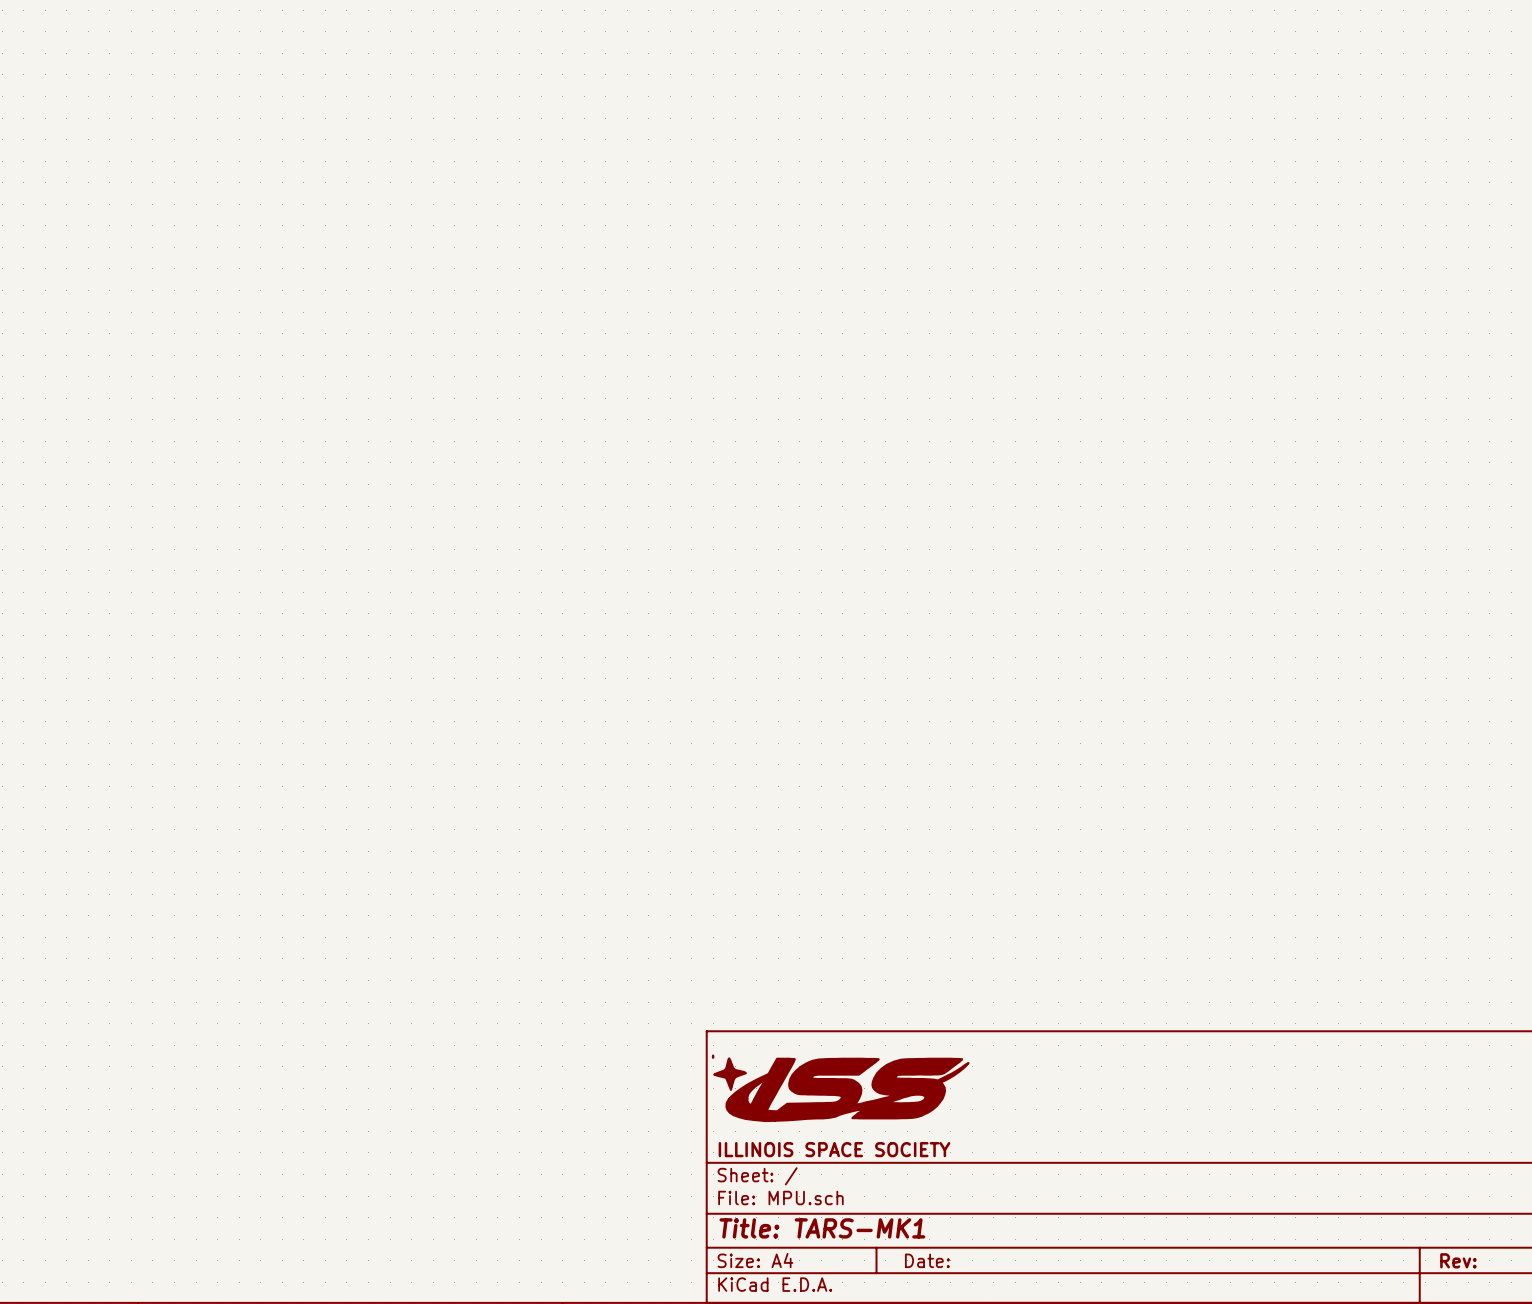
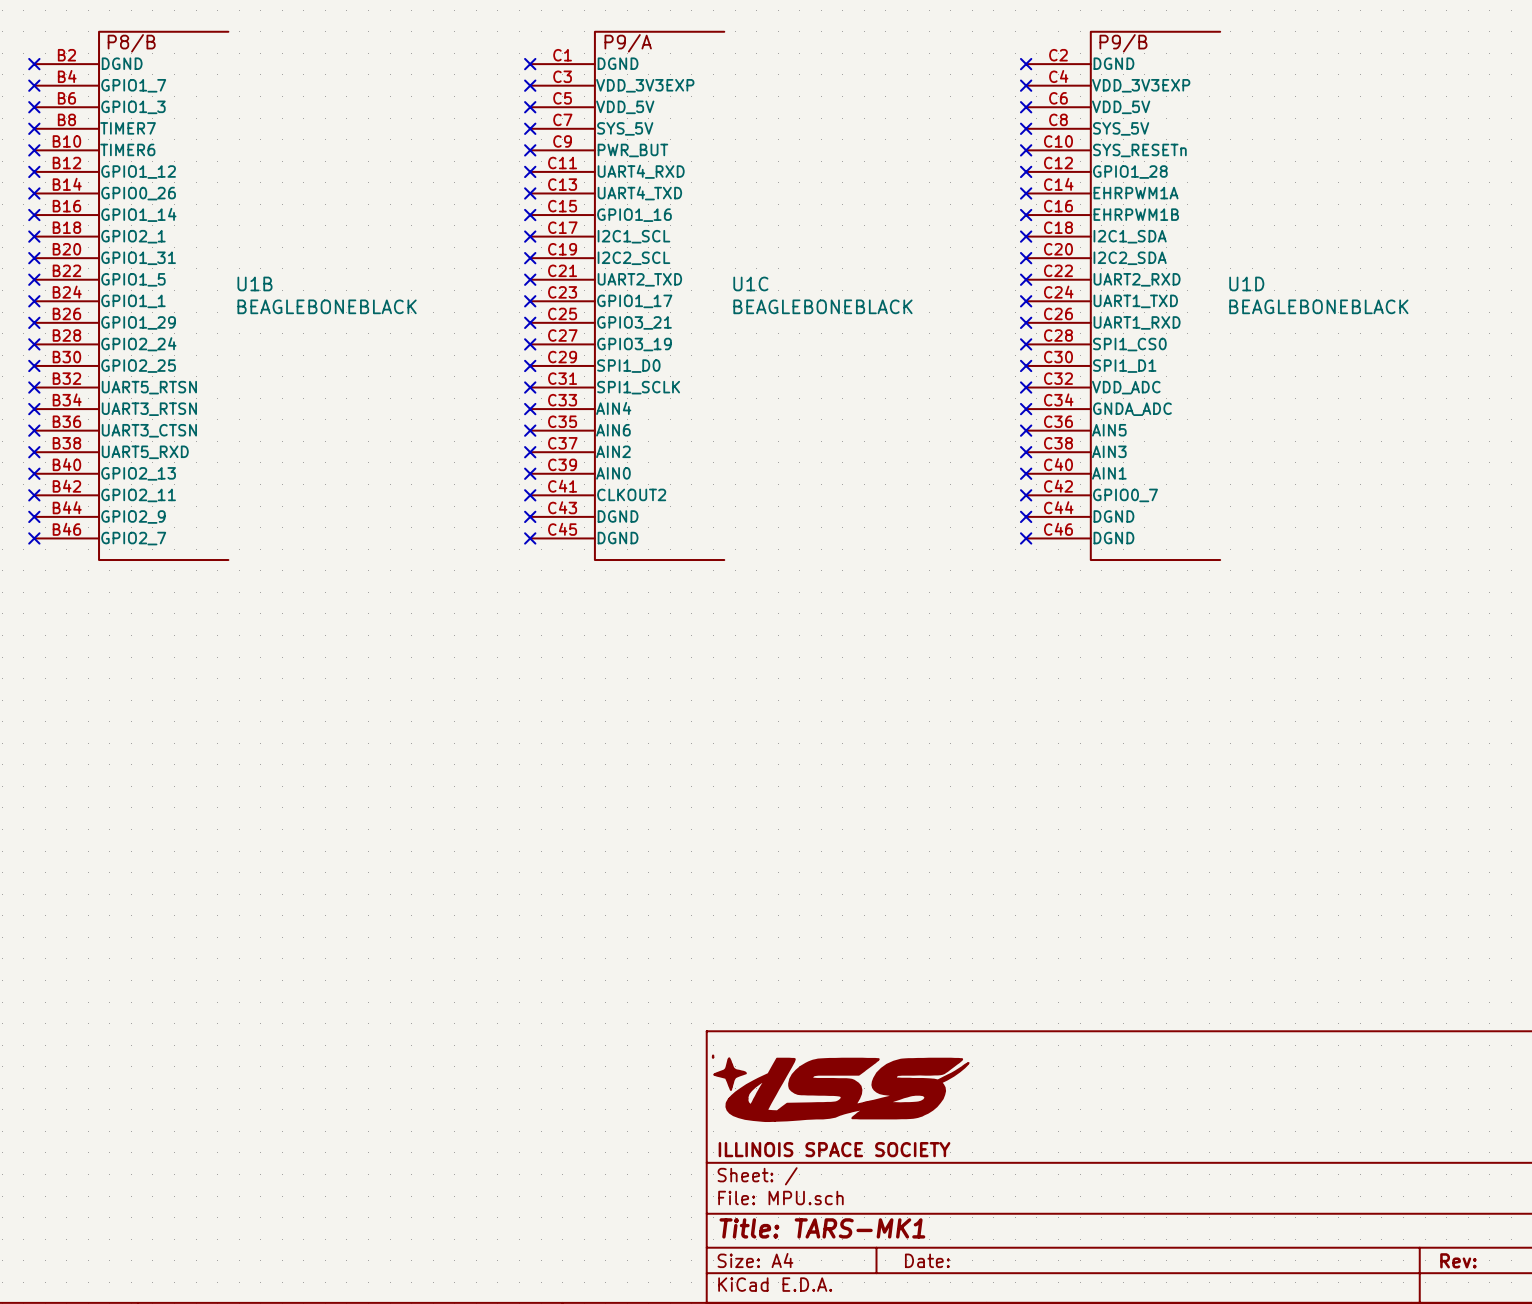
no-connect mark: none -> (34, 64)
no-connect mark: none -> (530, 64)
no-connect mark: none -> (1026, 64)
no-connect mark: none -> (34, 85)
no-connect mark: none -> (530, 85)
no-connect mark: none -> (1026, 85)
no-connect mark: none -> (34, 107)
no-connect mark: none -> (530, 107)
no-connect mark: none -> (1026, 107)
no-connect mark: none -> (34, 128)
no-connect mark: none -> (530, 128)
no-connect mark: none -> (1026, 128)
no-connect mark: none -> (34, 150)
no-connect mark: none -> (530, 150)
no-connect mark: none -> (1026, 150)
no-connect mark: none -> (34, 171)
no-connect mark: none -> (530, 171)
no-connect mark: none -> (1026, 171)
no-connect mark: none -> (34, 193)
no-connect mark: none -> (530, 193)
no-connect mark: none -> (1026, 193)
no-connect mark: none -> (34, 215)
no-connect mark: none -> (530, 215)
no-connect mark: none -> (1026, 215)
no-connect mark: none -> (34, 236)
no-connect mark: none -> (530, 236)
no-connect mark: none -> (1026, 236)
no-connect mark: none -> (34, 258)
no-connect mark: none -> (530, 258)
no-connect mark: none -> (1026, 258)
no-connect mark: none -> (34, 279)
no-connect mark: none -> (530, 279)
no-connect mark: none -> (1026, 279)
U1B: none -> BEAGLEBONEBLACK (131, 295)
U1C: none -> BEAGLEBONEBLACK (627, 295)
U1D: none -> BEAGLEBONEBLACK (1123, 295)
no-connect mark: none -> (34, 301)
no-connect mark: none -> (530, 301)
no-connect mark: none -> (1026, 301)
no-connect mark: none -> (34, 322)
no-connect mark: none -> (530, 322)
no-connect mark: none -> (1026, 322)
no-connect mark: none -> (34, 344)
no-connect mark: none -> (530, 344)
no-connect mark: none -> (1026, 344)
no-connect mark: none -> (34, 365)
no-connect mark: none -> (530, 365)
no-connect mark: none -> (1026, 365)
no-connect mark: none -> (34, 387)
no-connect mark: none -> (530, 387)
no-connect mark: none -> (1026, 387)
no-connect mark: none -> (34, 409)
no-connect mark: none -> (530, 409)
no-connect mark: none -> (1026, 409)
no-connect mark: none -> (34, 430)
no-connect mark: none -> (530, 430)
no-connect mark: none -> (1026, 430)
no-connect mark: none -> (34, 452)
no-connect mark: none -> (530, 452)
no-connect mark: none -> (1026, 452)
no-connect mark: none -> (34, 473)
no-connect mark: none -> (530, 473)
no-connect mark: none -> (1026, 473)
no-connect mark: none -> (34, 495)
no-connect mark: none -> (530, 495)
no-connect mark: none -> (1026, 495)
no-connect mark: none -> (34, 516)
no-connect mark: none -> (530, 516)
no-connect mark: none -> (1026, 516)
no-connect mark: none -> (34, 538)
no-connect mark: none -> (530, 538)
no-connect mark: none -> (1026, 538)

